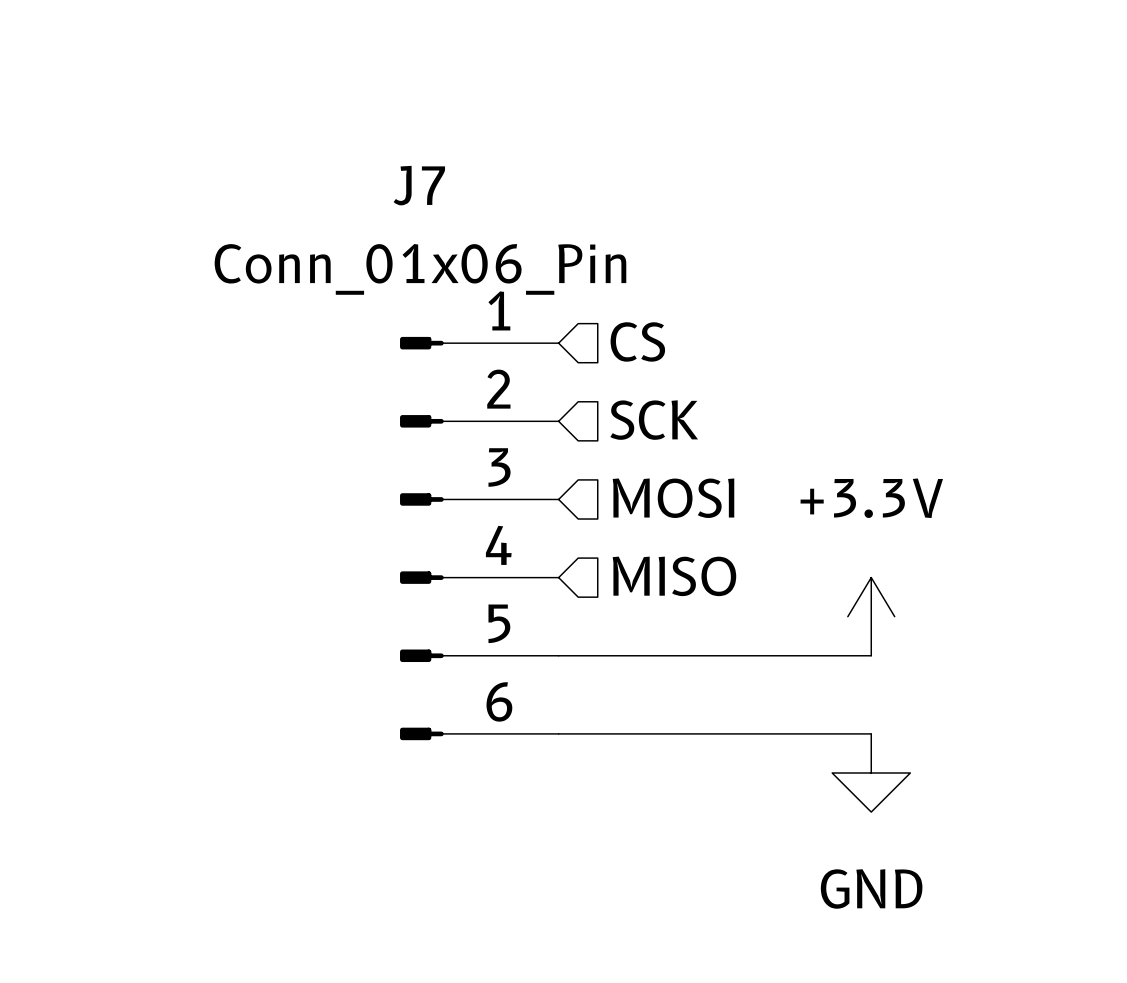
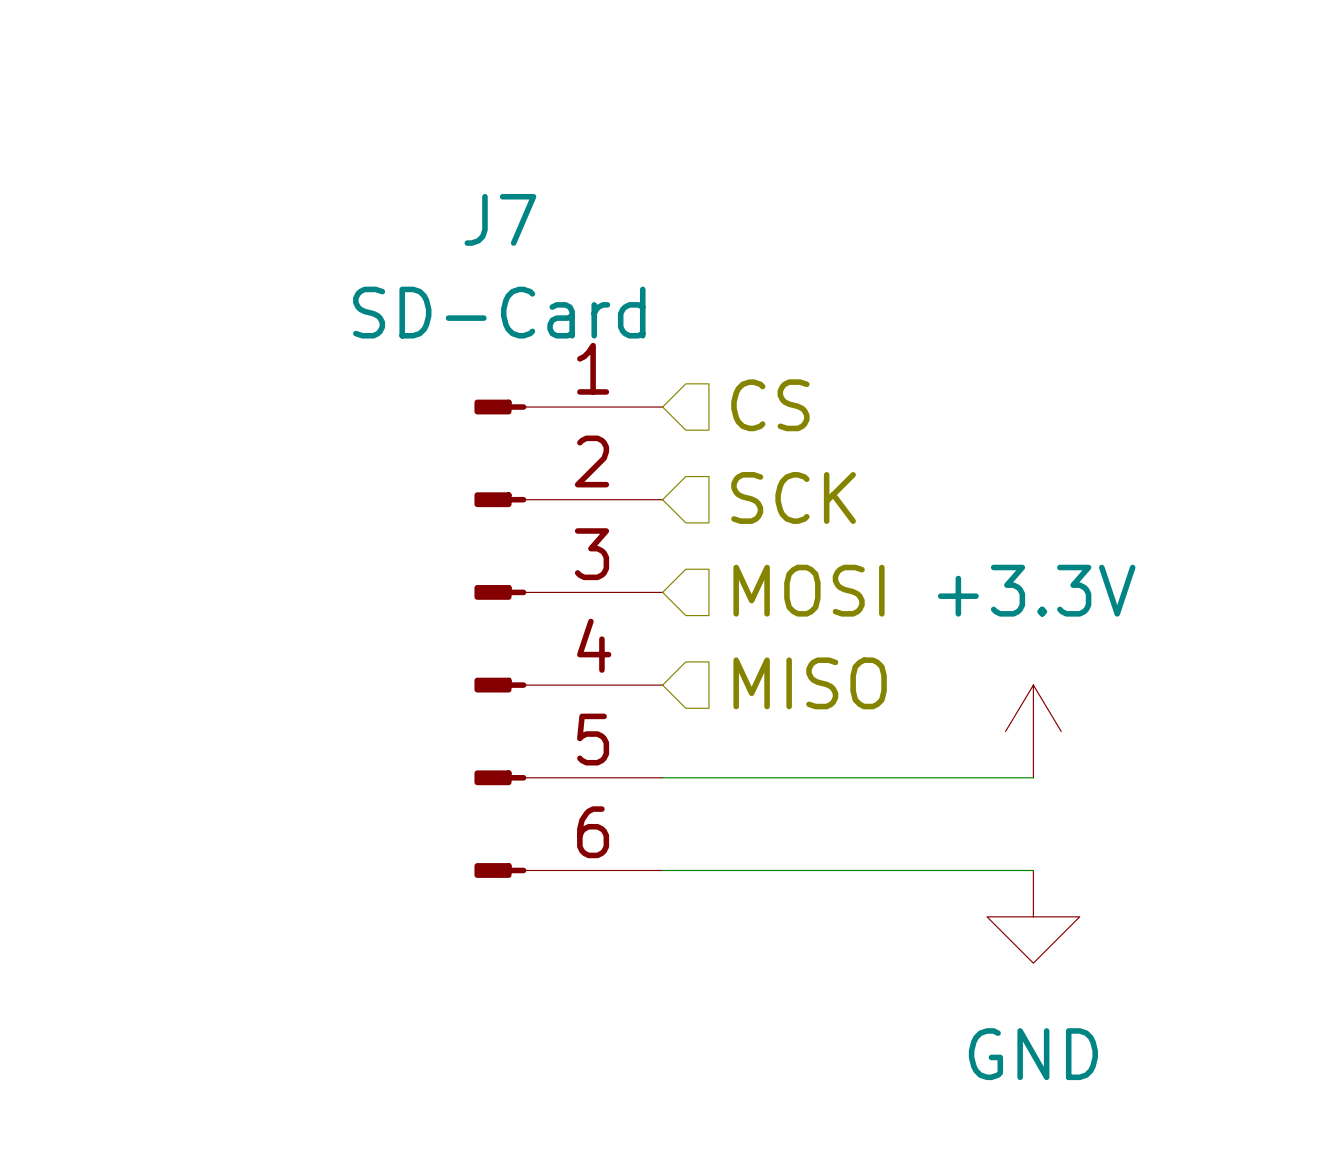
J7 value: Conn_01x06_Pin (420, 269) -> SD-Card (499, 312)

